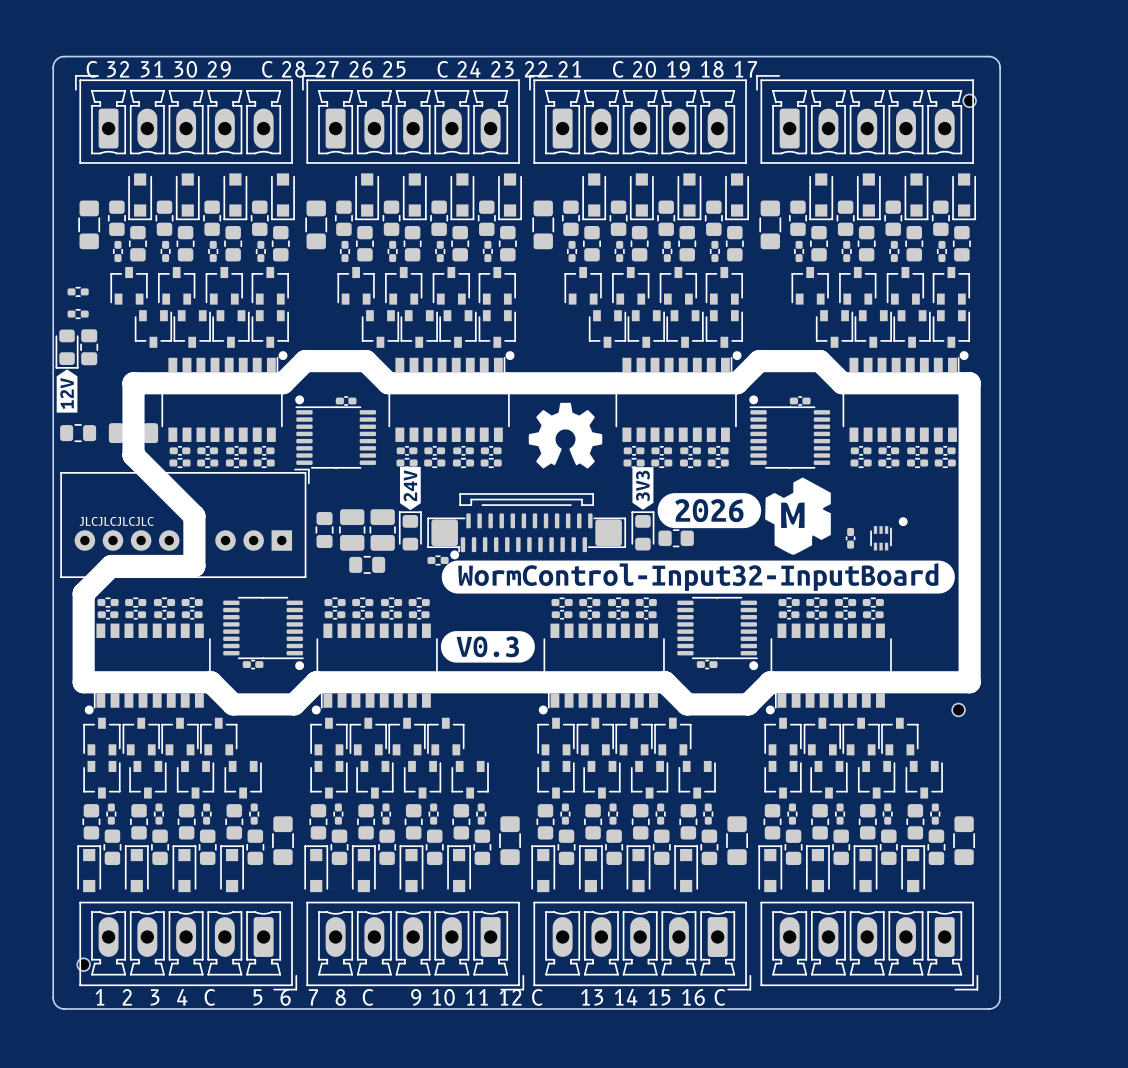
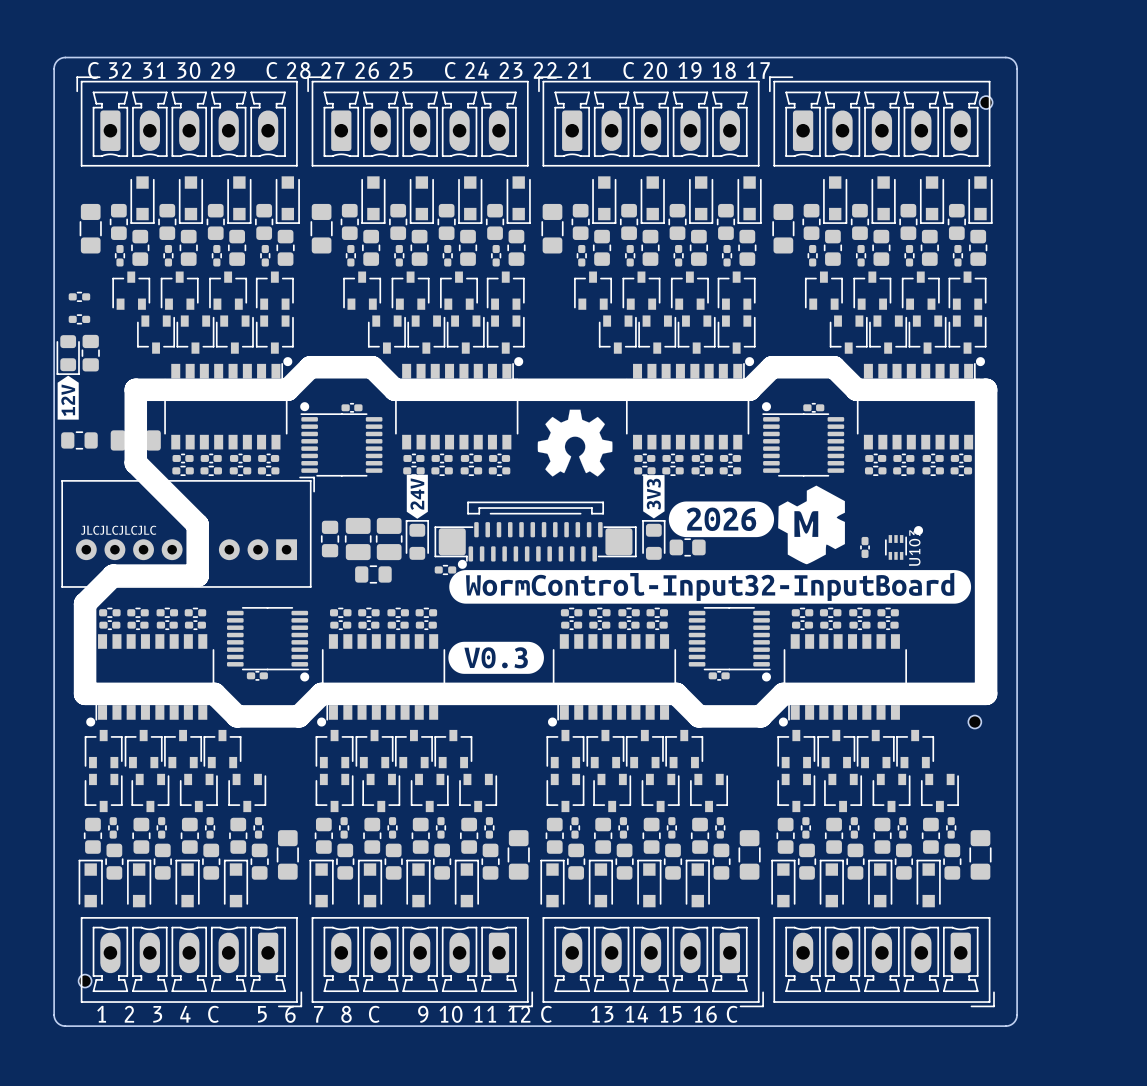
U103 name: none -> U103 (914, 547)

